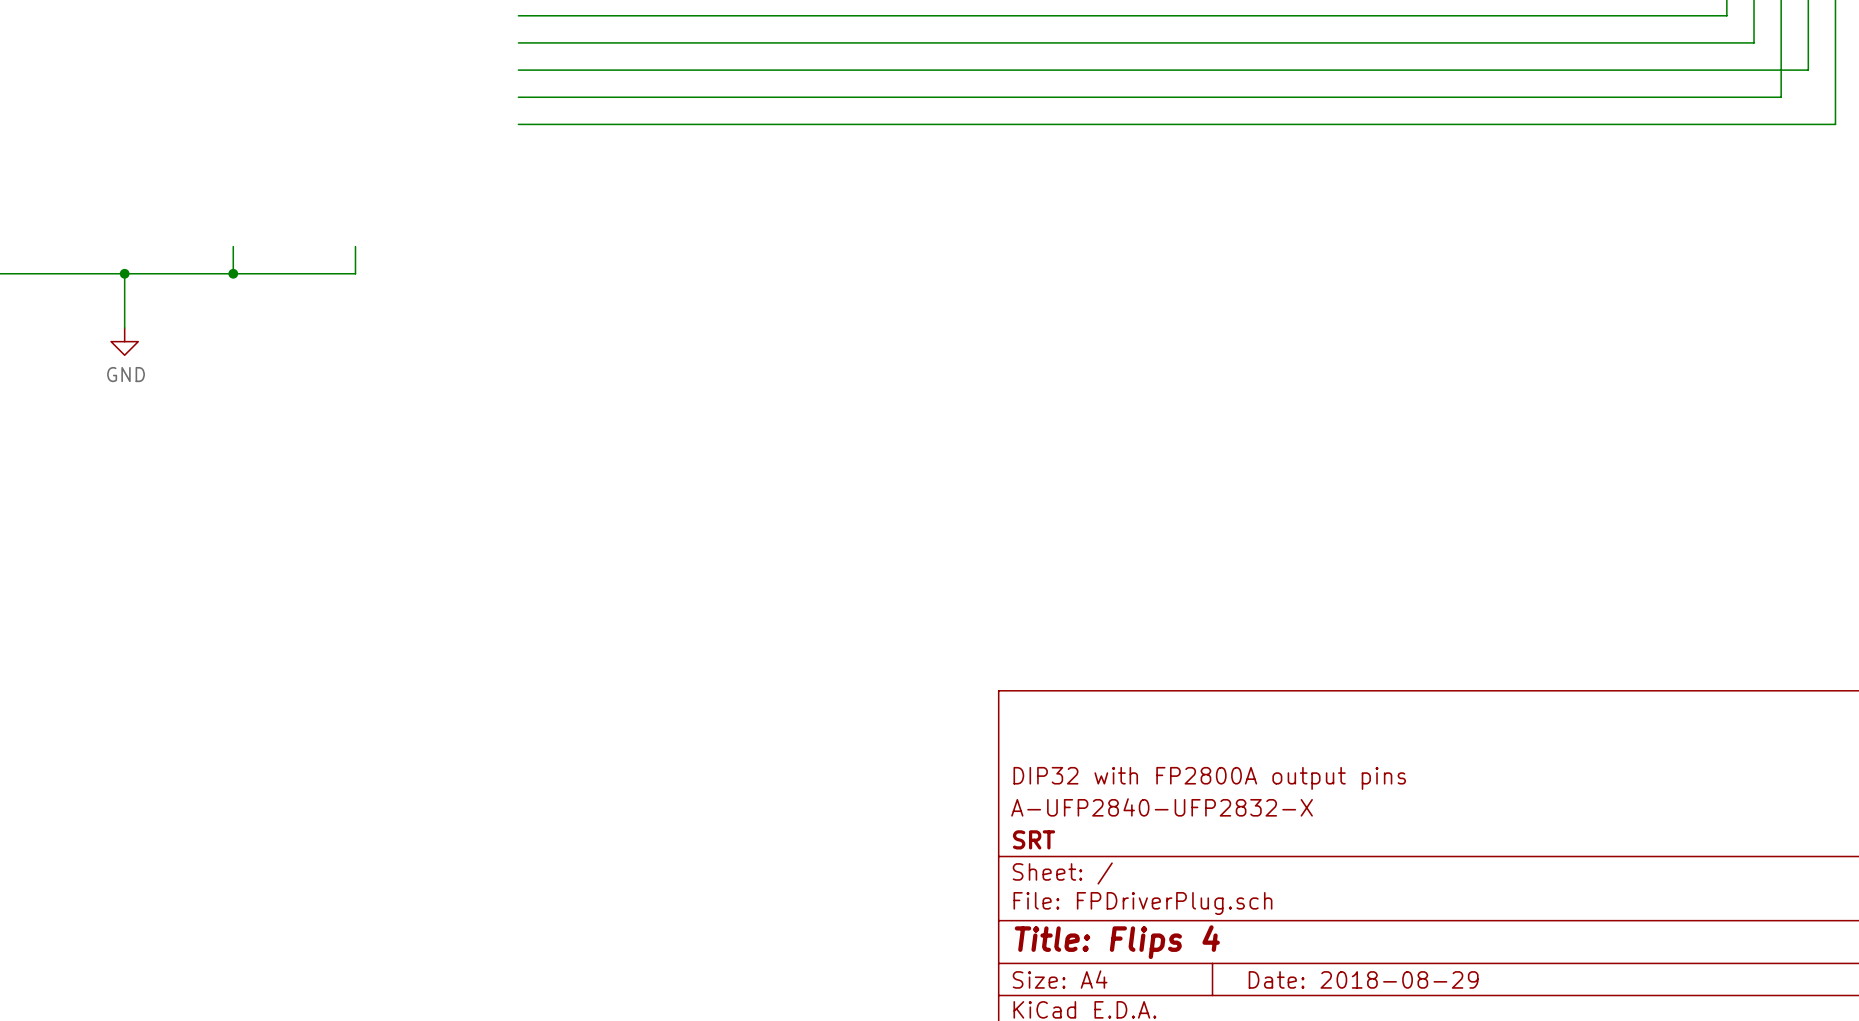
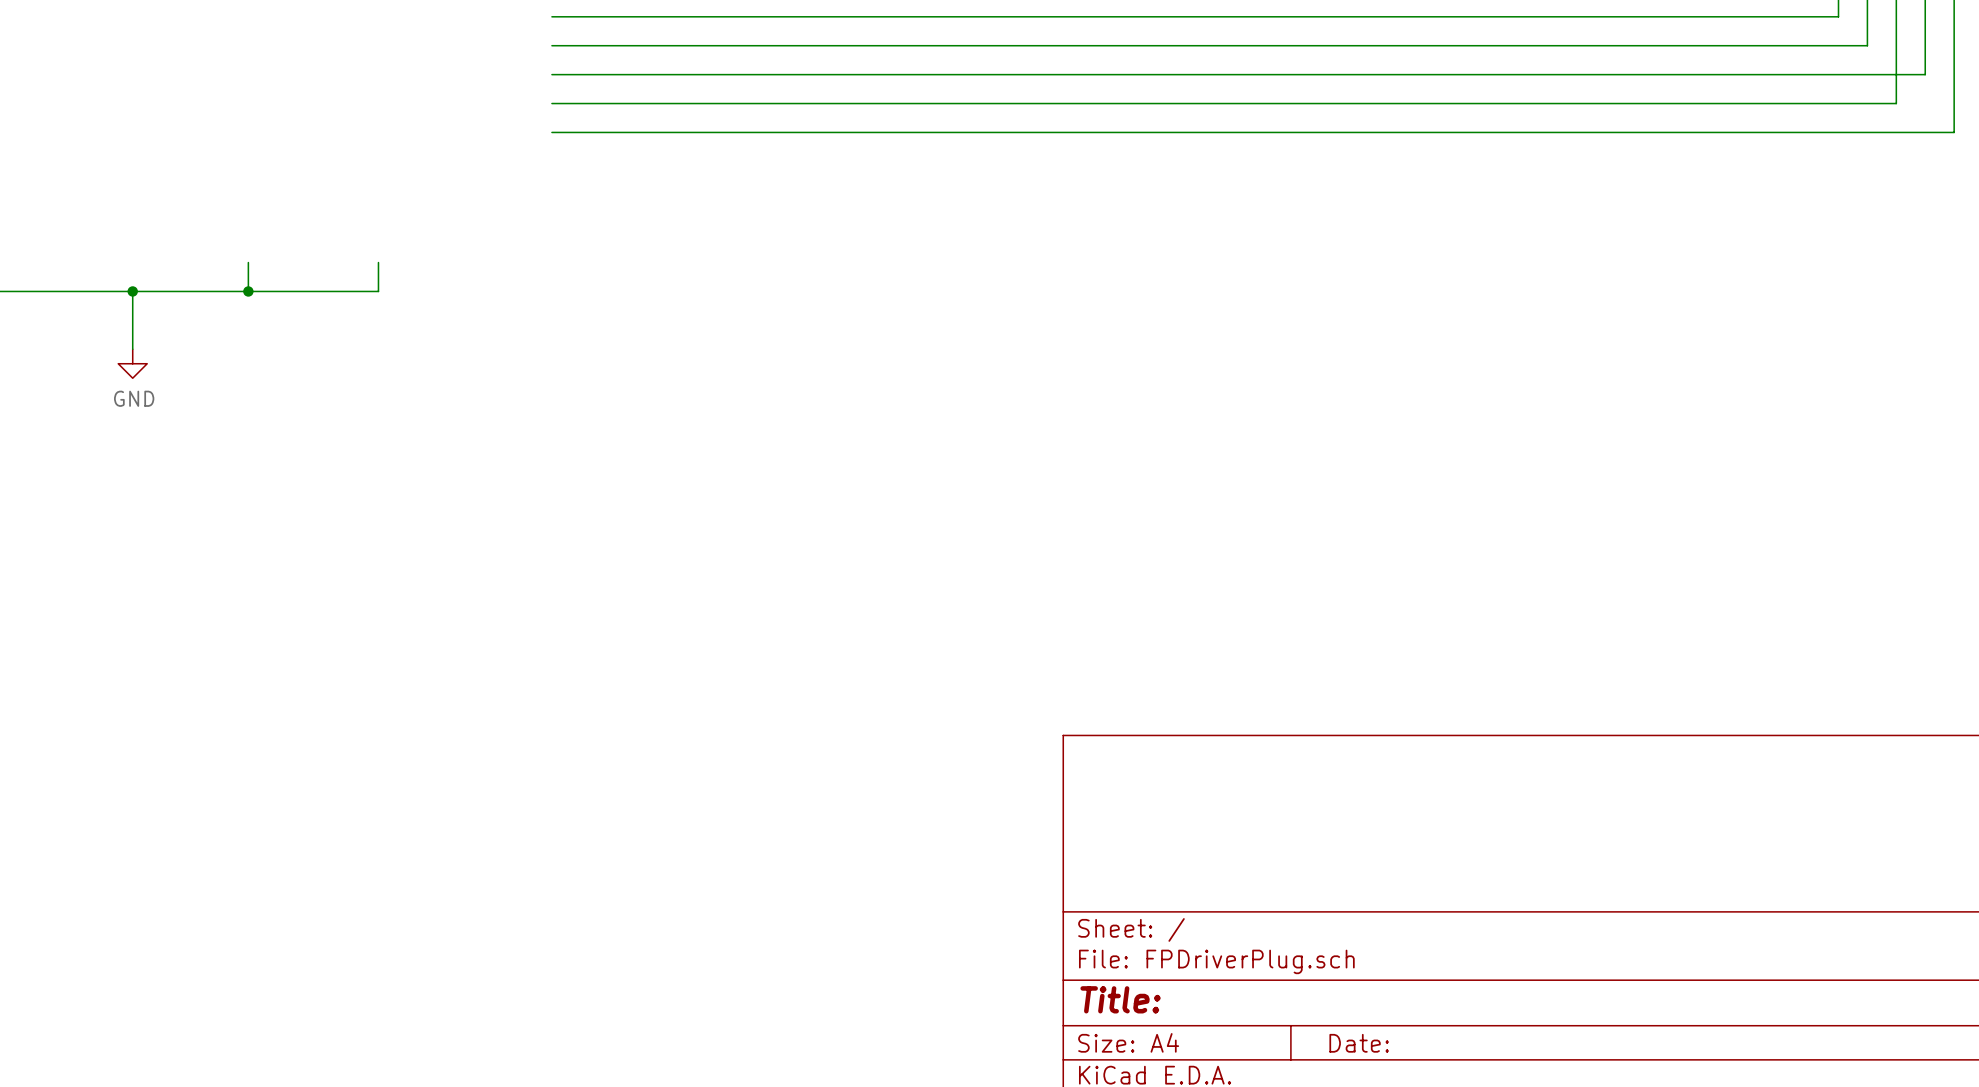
title block: DIP32 with FP2800A output pins (1209, 778) -> none
title block: A-UFP2840-UFP2832-X (1162, 807) -> none
title block: SRT (1034, 839) -> none
title block: Title: Flips 4 (1117, 942) -> Title: (1120, 999)
title block: Date: 2018-08-29 (1363, 979) -> Date: (1359, 1043)

